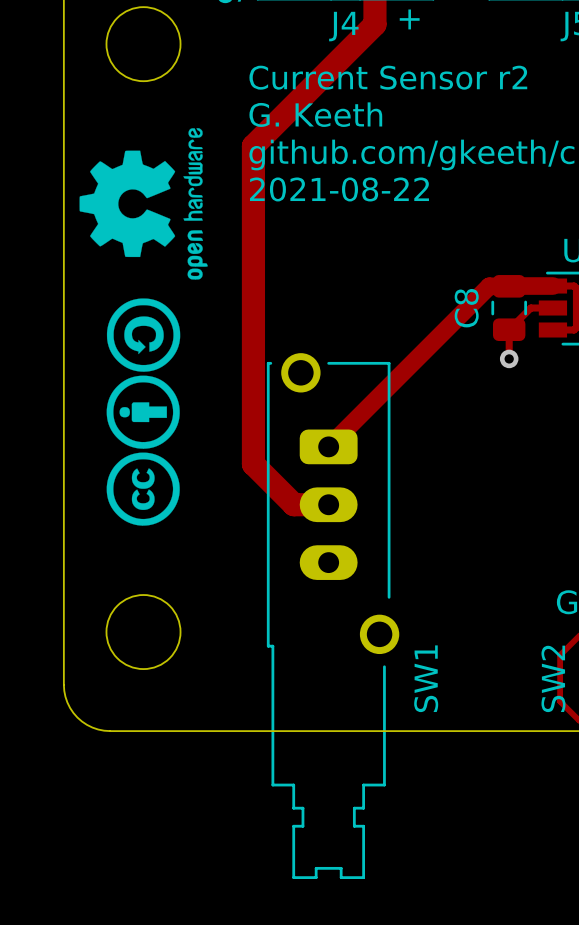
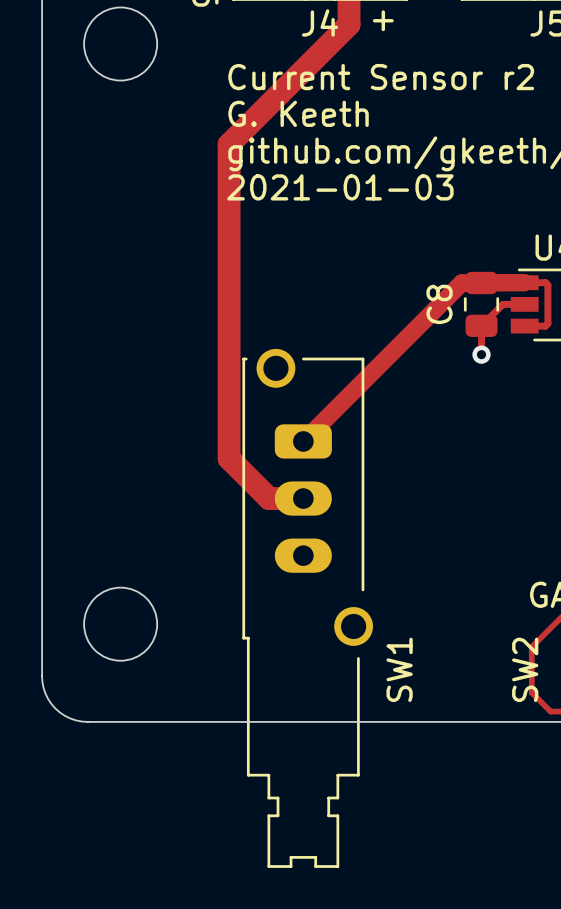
drawing: [79, 128, 208, 526] -> none
text: 2021-08-22 (339, 189) -> 2021-01-03 (340, 187)

